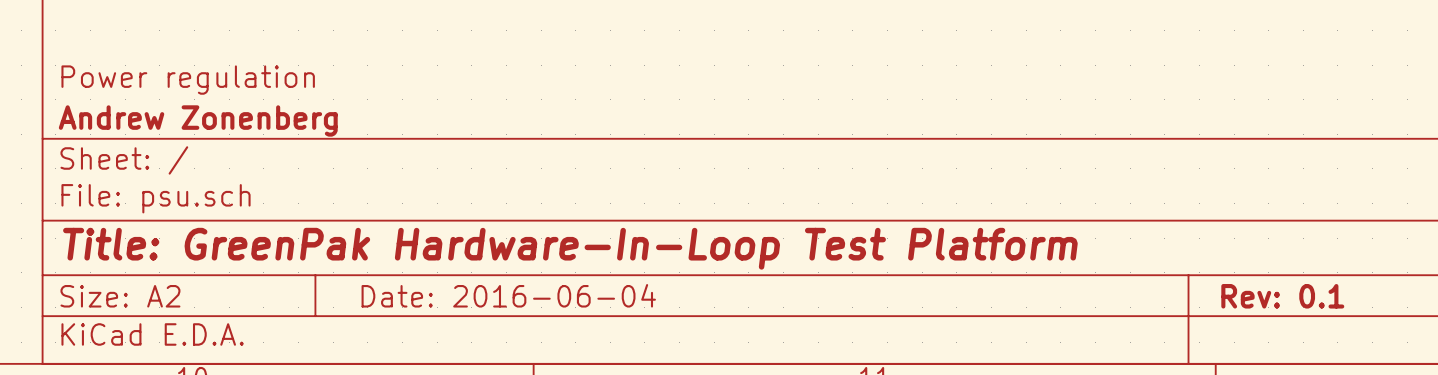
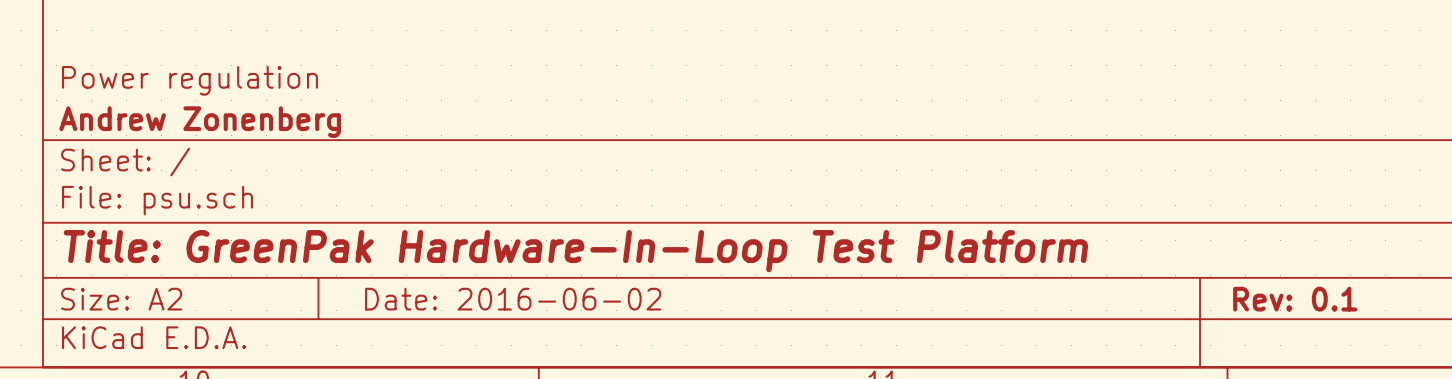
title block: Date: 2016-06-04 (508, 295) -> Date: 2016-06-02 (513, 299)

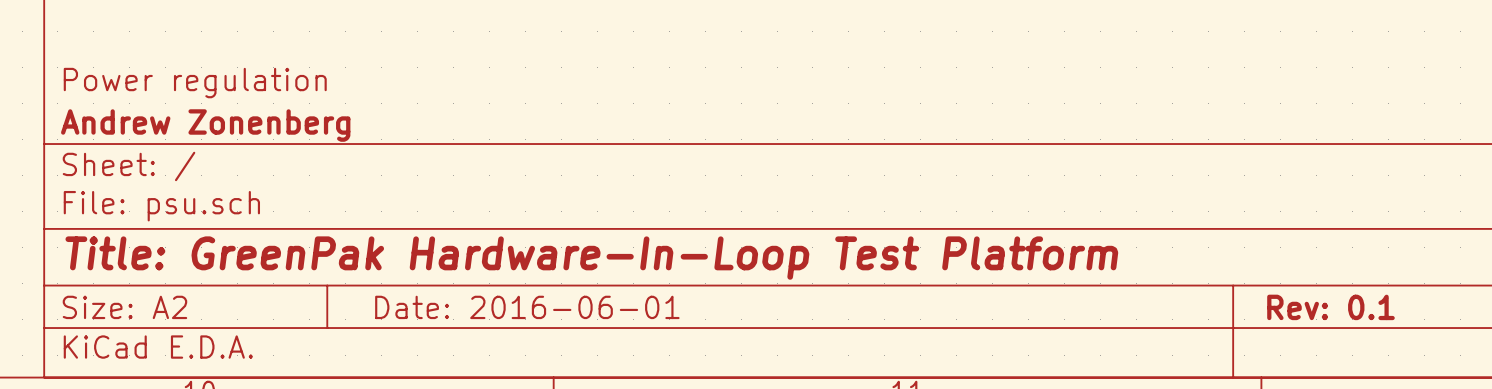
title block: Date: 2016-06-02 (513, 299) -> Date: 2016-06-01 (527, 307)

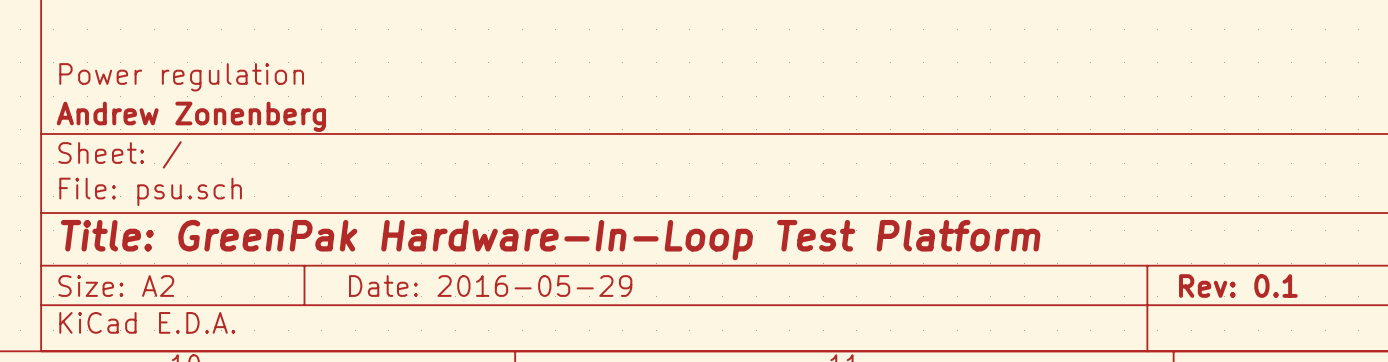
title block: Date: 2016-06-01 (527, 307) -> Date: 2016-05-29 (490, 286)

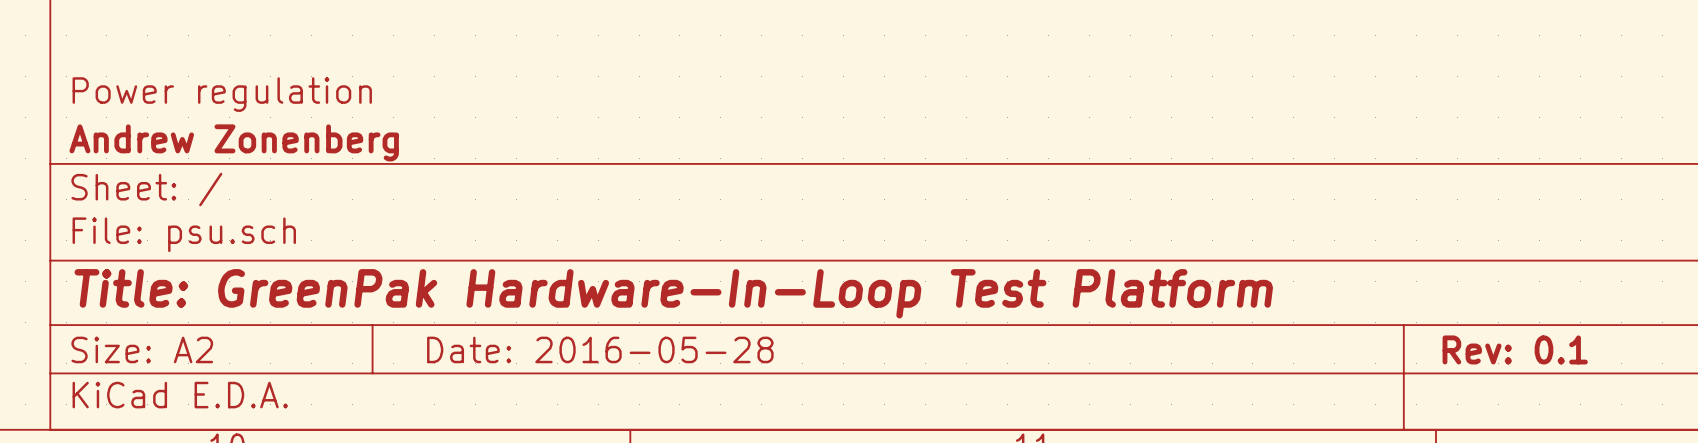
title block: Date: 2016-05-29 (490, 286) -> Date: 2016-05-28 (600, 349)

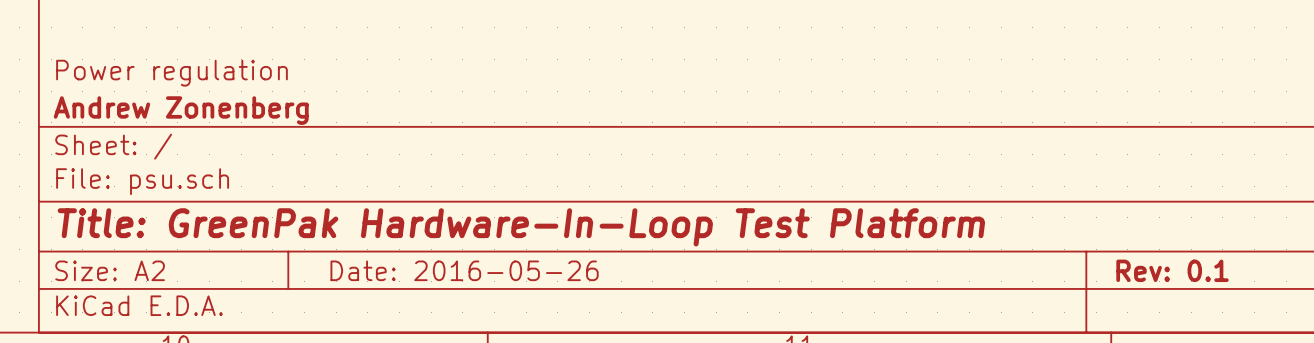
title block: Date: 2016-05-28 (600, 349) -> Date: 2016-05-26 (464, 270)

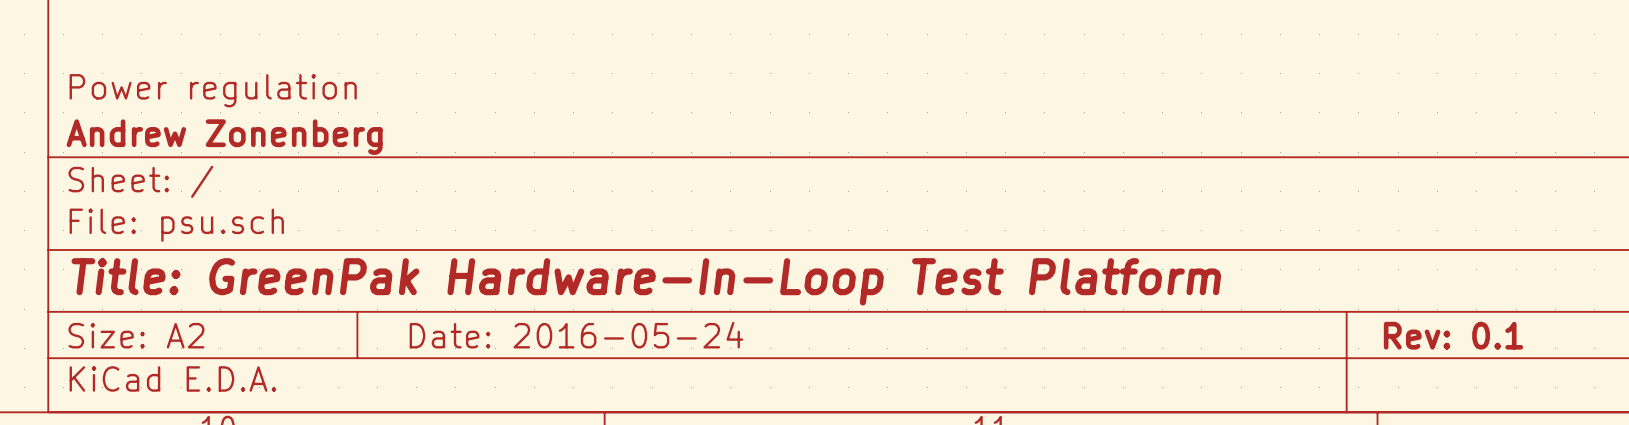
title block: Date: 2016-05-26 (464, 270) -> Date: 2016-05-24 (576, 335)

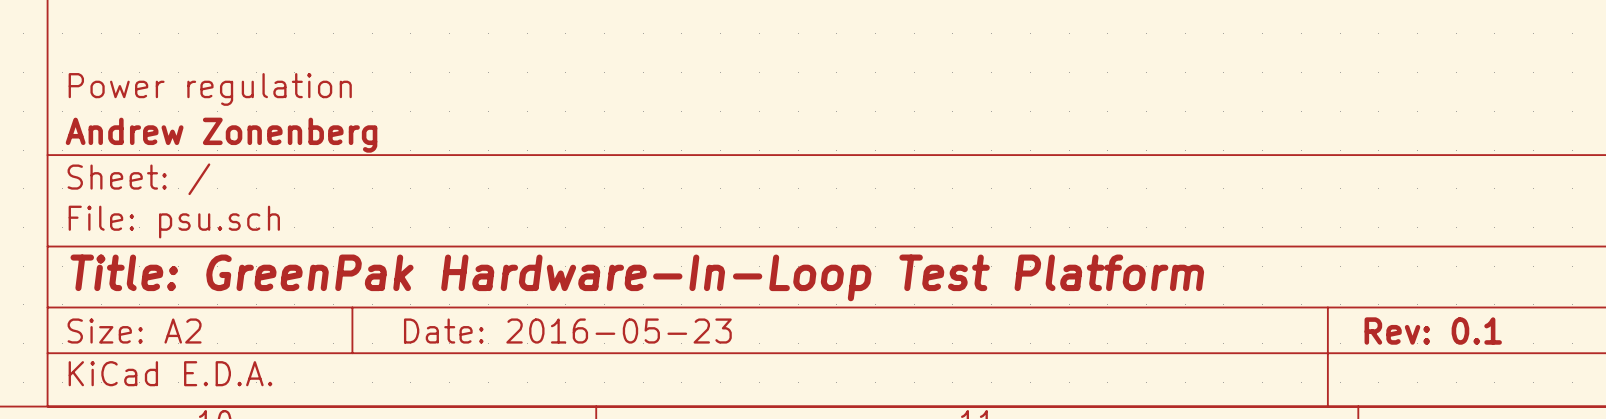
title block: Date: 2016-05-24 (576, 335) -> Date: 2016-05-23 (567, 331)

